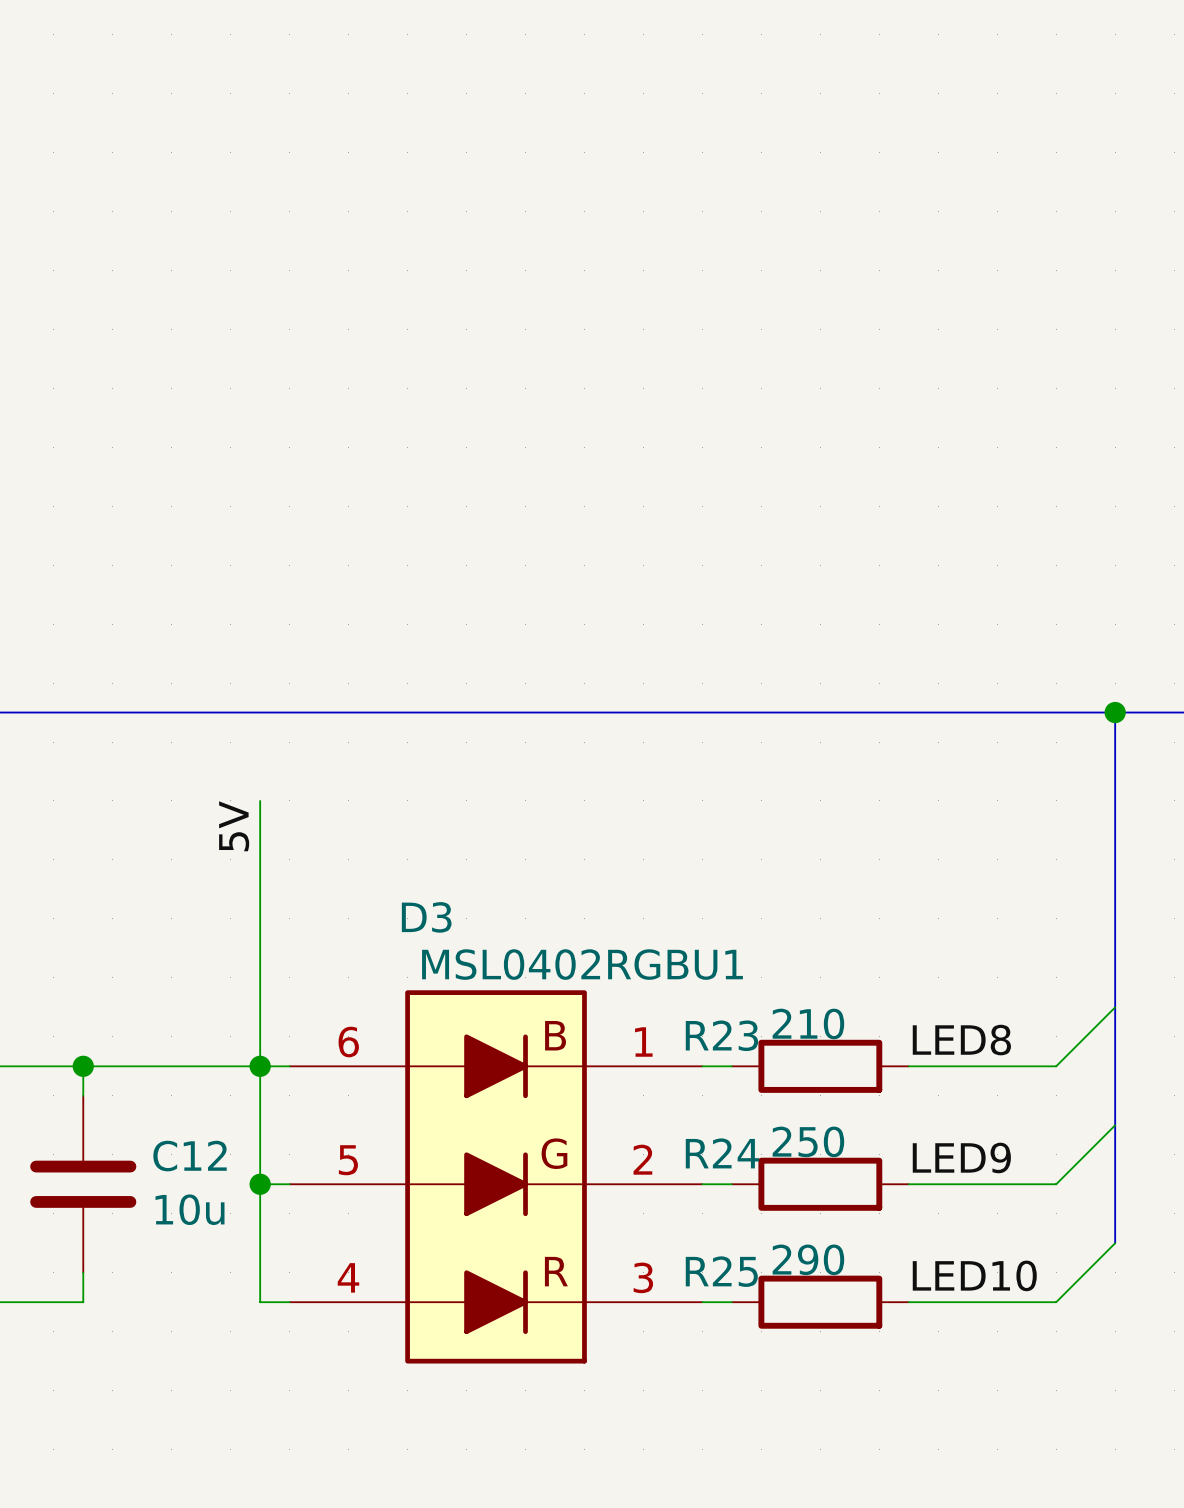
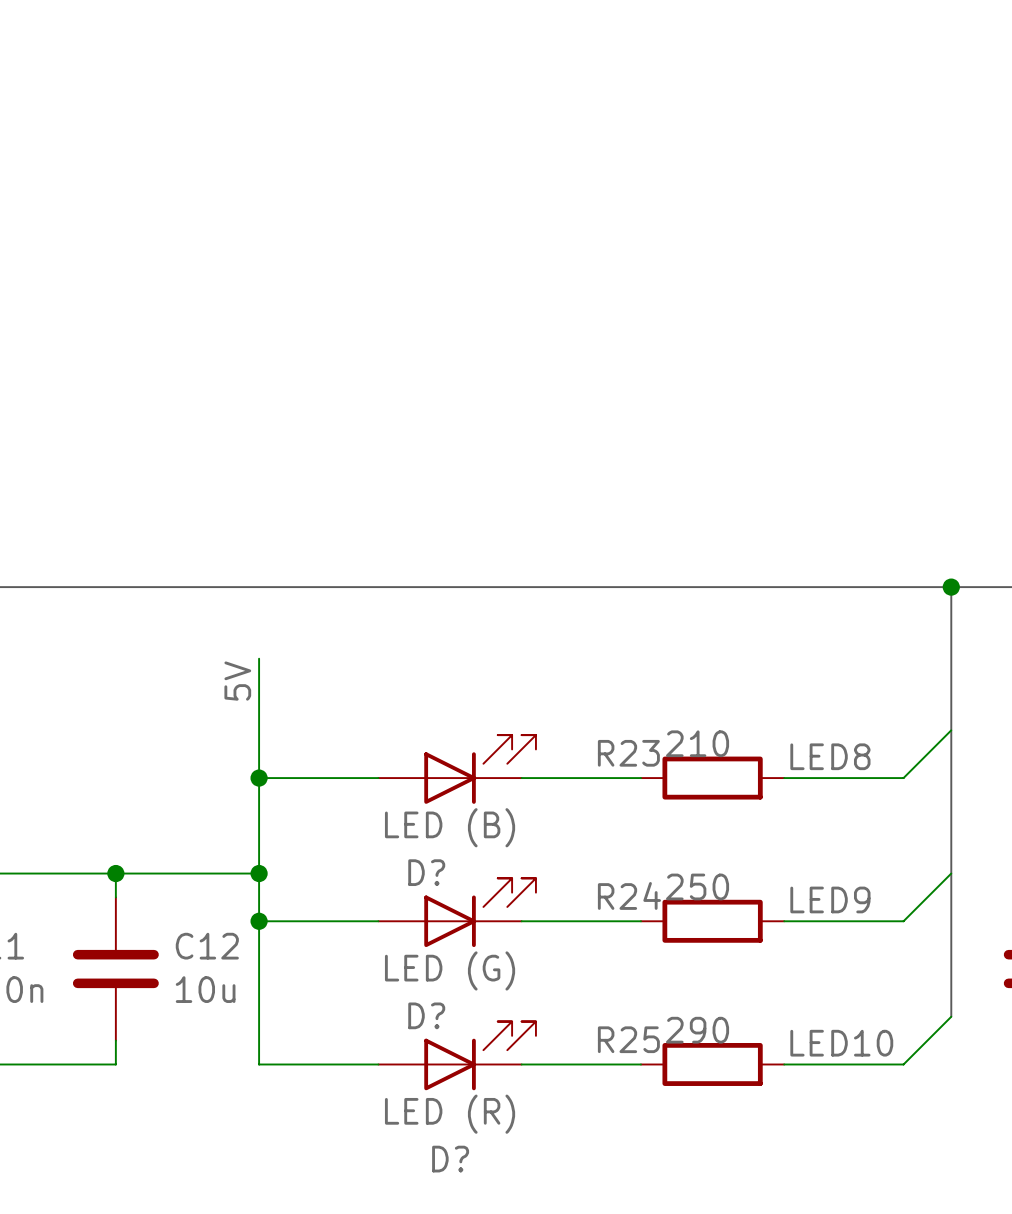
D?: none -> LED (B) (457, 769)
wire: none -> (259, 778) (378, 778)
junction: none -> (259, 778)
wire: none -> (521, 778) (640, 778)
wire: (1115, 1007) (1056, 1066) (908, 1066) -> (951, 873) (903, 921) (784, 921)
label position: LED8 (961, 1040) -> LED8 (830, 756)
wire: (260, 1066) (289, 1066) -> none
wire: (702, 1066) (731, 1066) -> none
R23 position: (820, 1066) -> (712, 778)
D?: none -> LED (G) (457, 912)
wire: none -> (259, 921) (378, 921)
wire: none -> (521, 921) (640, 921)
wire: (1115, 1125) (1056, 1184) (908, 1184) -> (951, 730) (903, 778) (784, 778)
label position: LED9 (961, 1157) -> LED9 (830, 899)
D3: MSL0402RGBU1 (496, 1176) -> none
wire: (260, 1184) (289, 1184) -> none
junction position: (260, 1184) -> (259, 921)
wire: (702, 1184) (731, 1184) -> none
R24 position: (820, 1184) -> (712, 921)
D?: none -> LED (R) (457, 1055)

